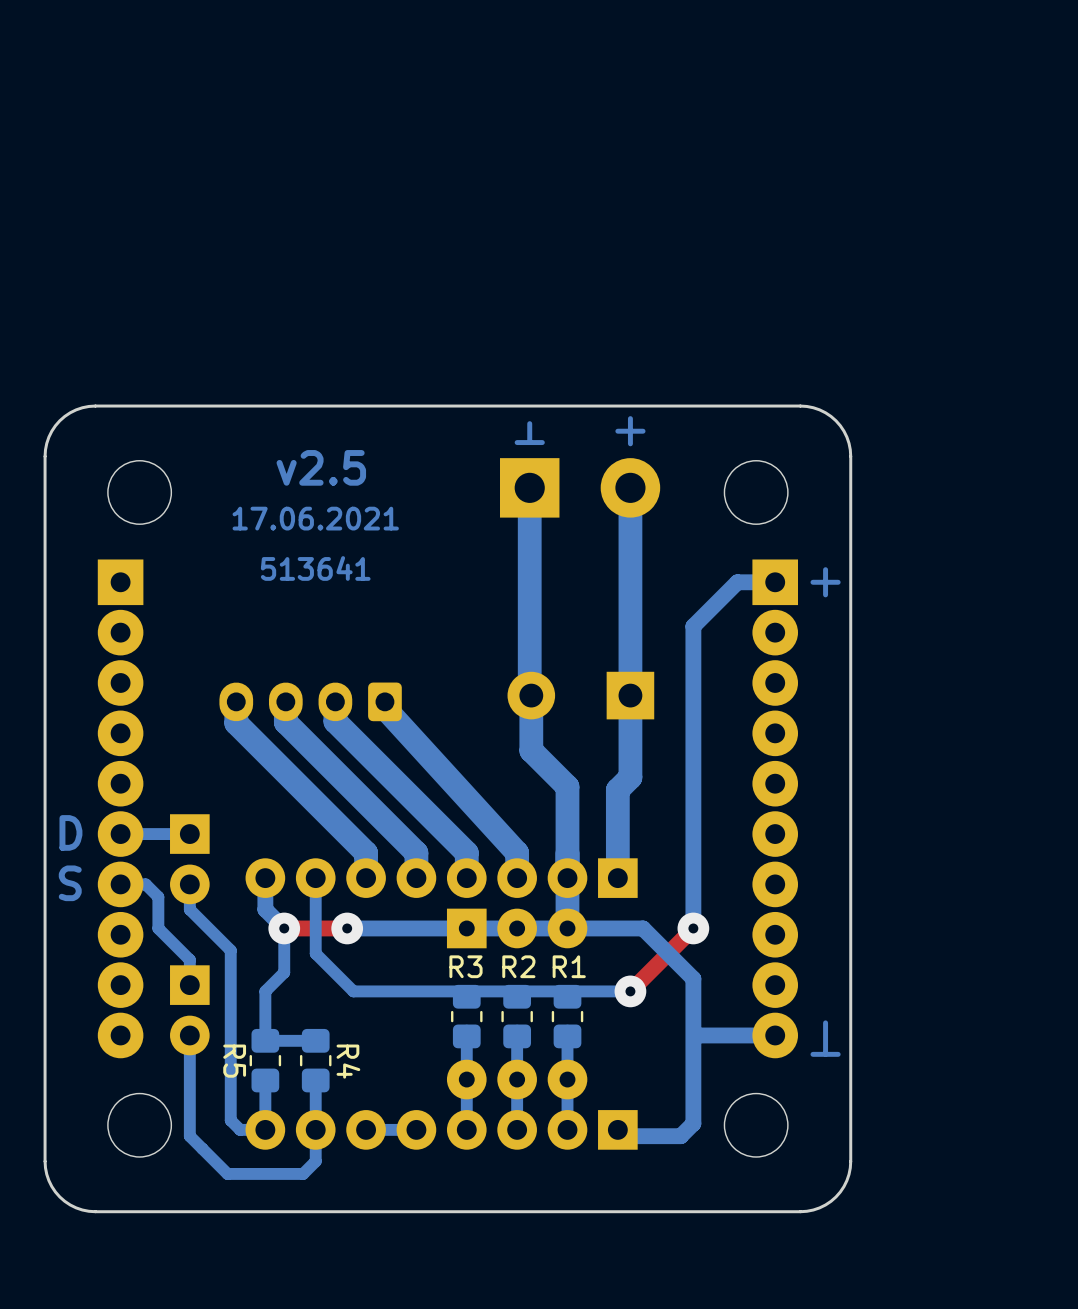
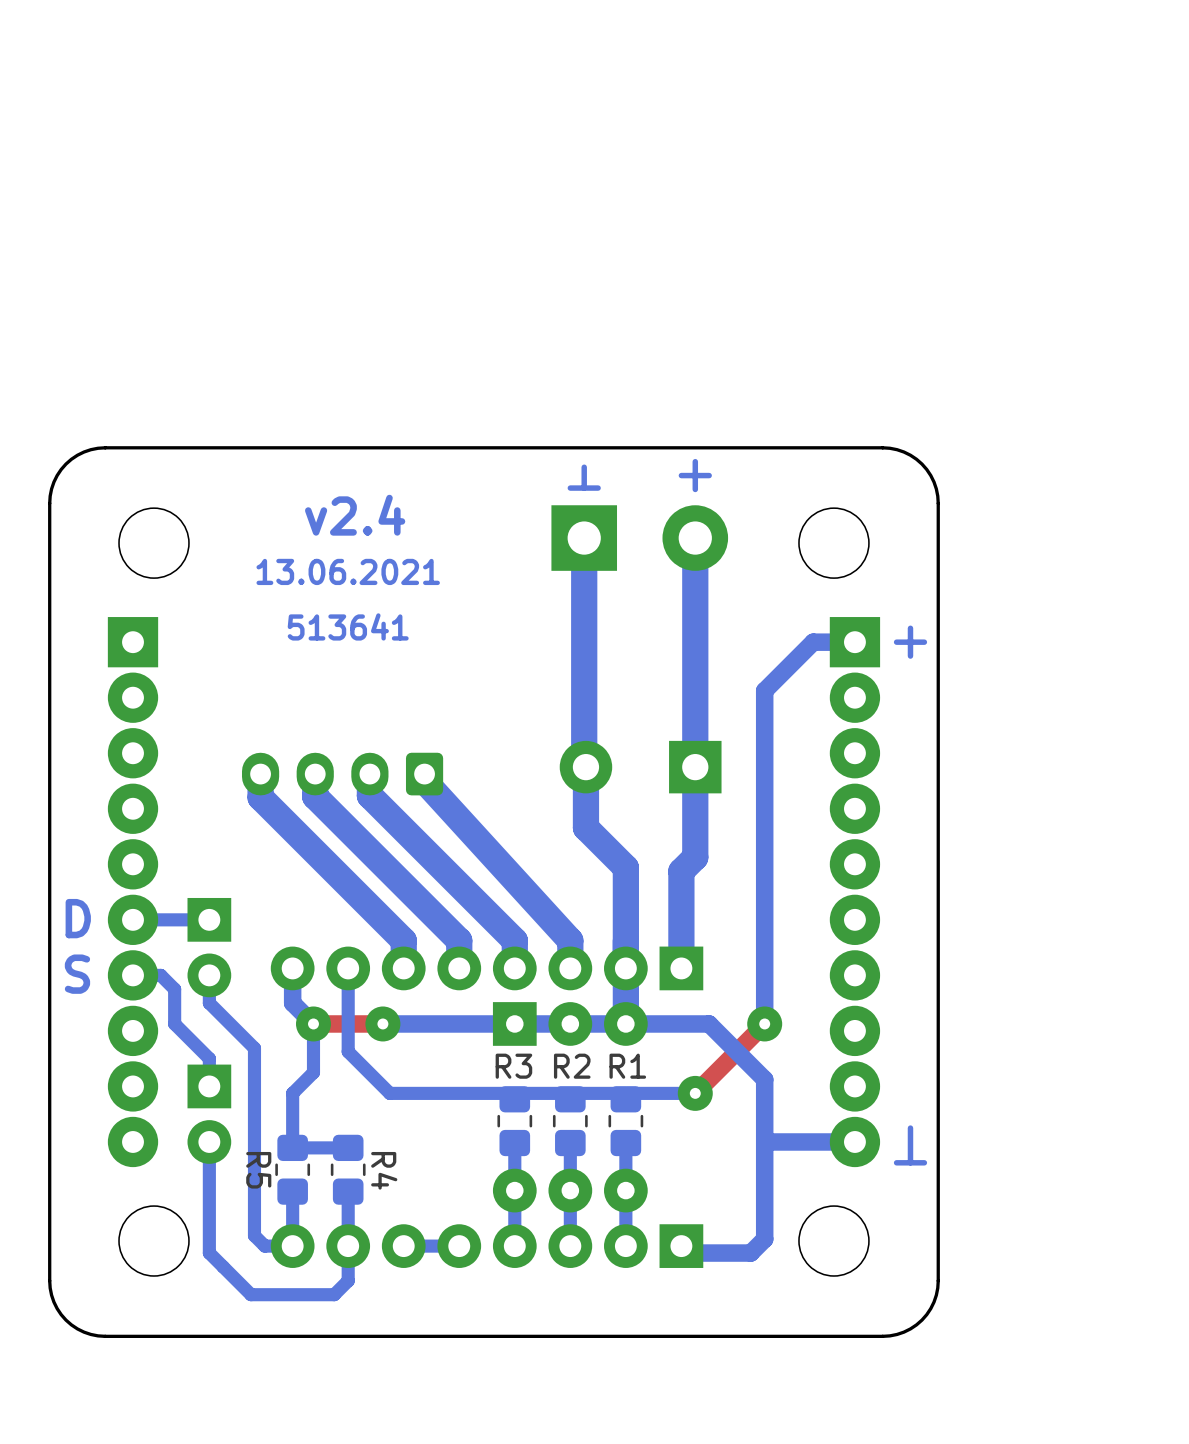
text: v2.5 (321, 467) -> v2.4 (355, 515)
text: 17.06.2021 (315, 518) -> 13.06.2021 (348, 571)

